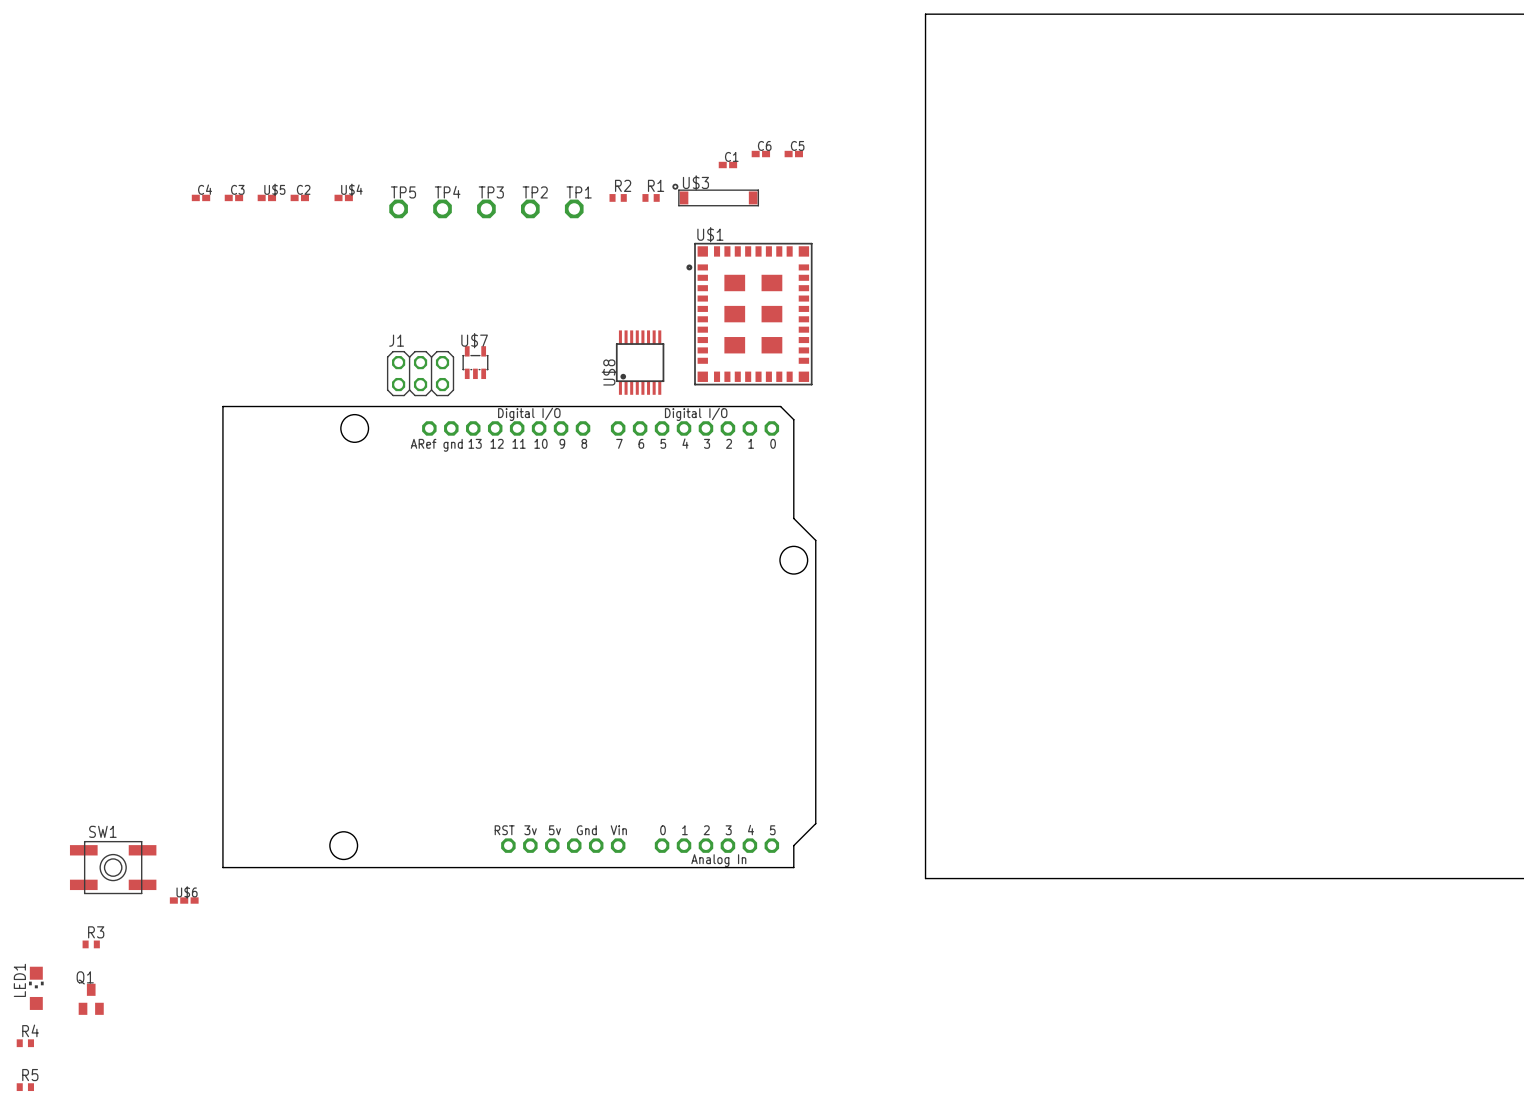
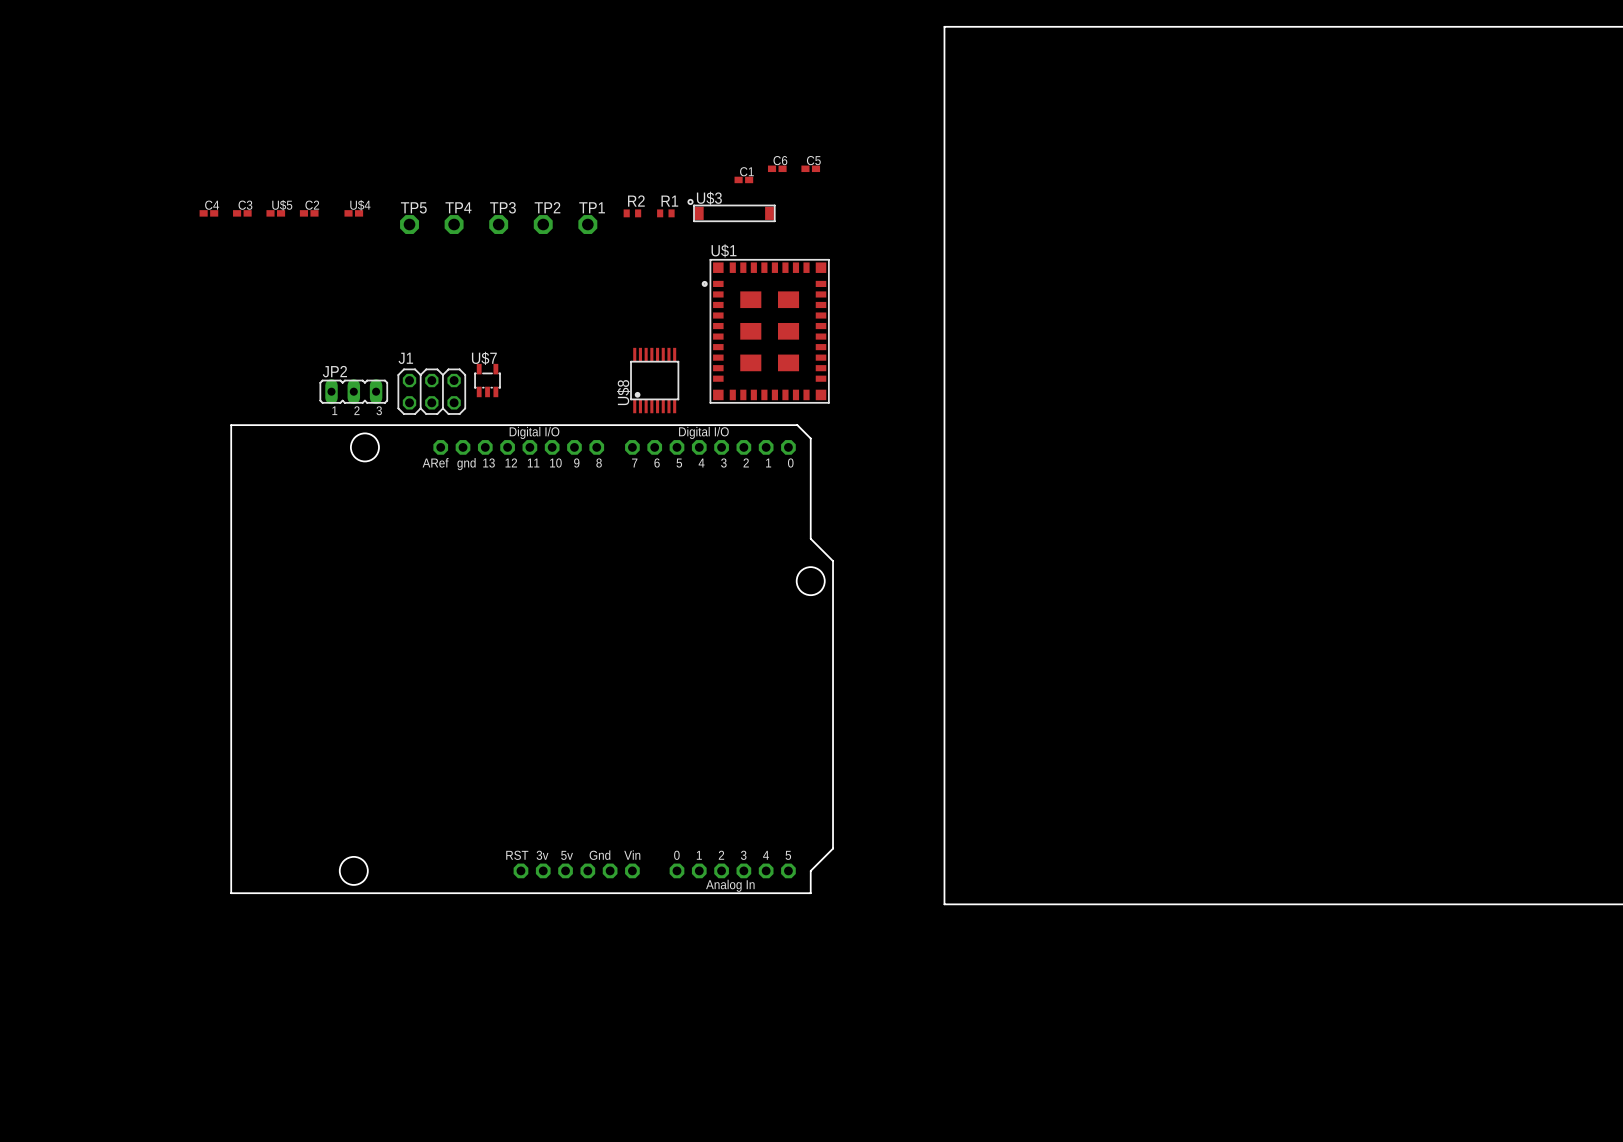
JP2: none -> (353, 391)
SW1: (113, 867) -> none
U$6: (184, 900) -> none
R3: (91, 944) -> none
LED1: (36, 988) -> none
Q1: (91, 999) -> none
R4: (25, 1043) -> none
R5: (25, 1087) -> none

